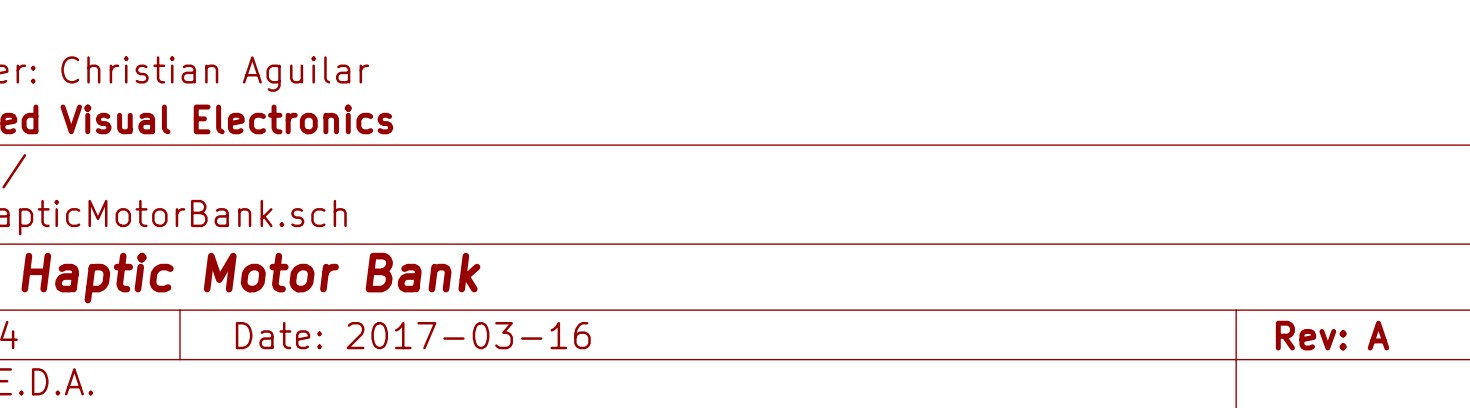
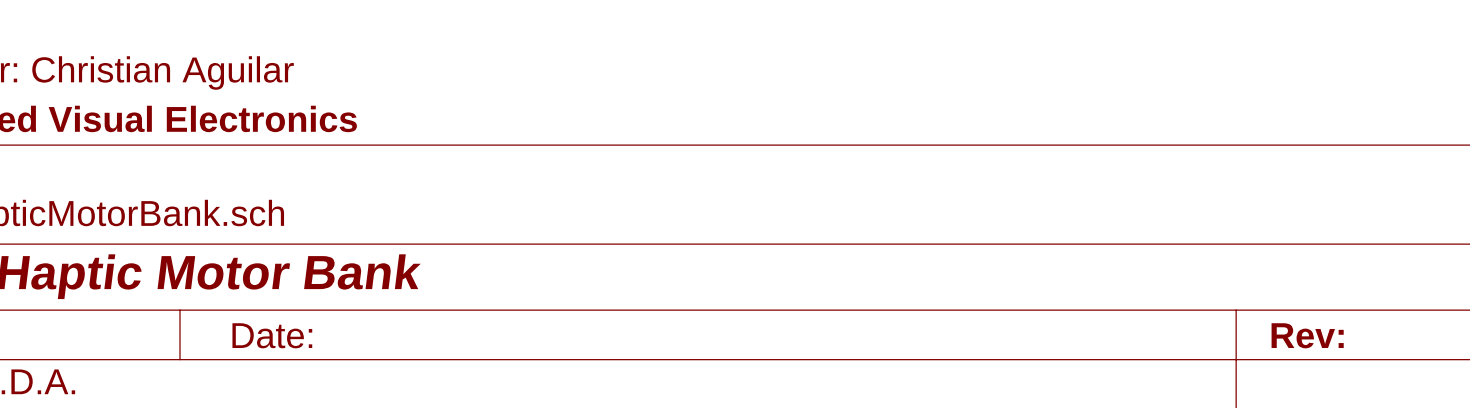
title block: Date: 2017-03-16 (413, 335) -> Date: (272, 335)
title block: Rev: A (1332, 335) -> Rev: (1307, 335)

